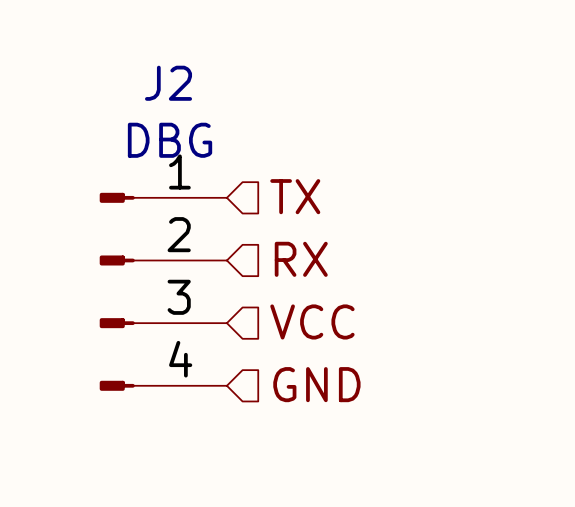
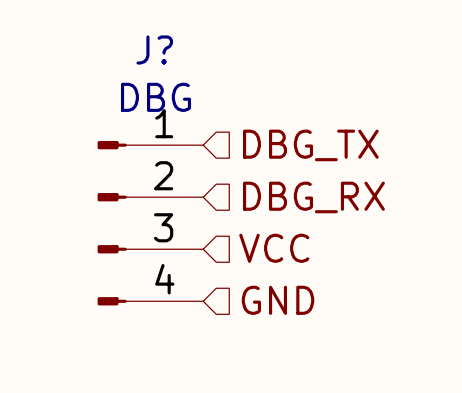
J2 name: J2 (168, 83) -> J? (154, 49)
hierarchical label: TX (295, 196) -> DBG_TX (310, 145)
hierarchical label: RX (301, 259) -> DBG_RX (313, 197)

